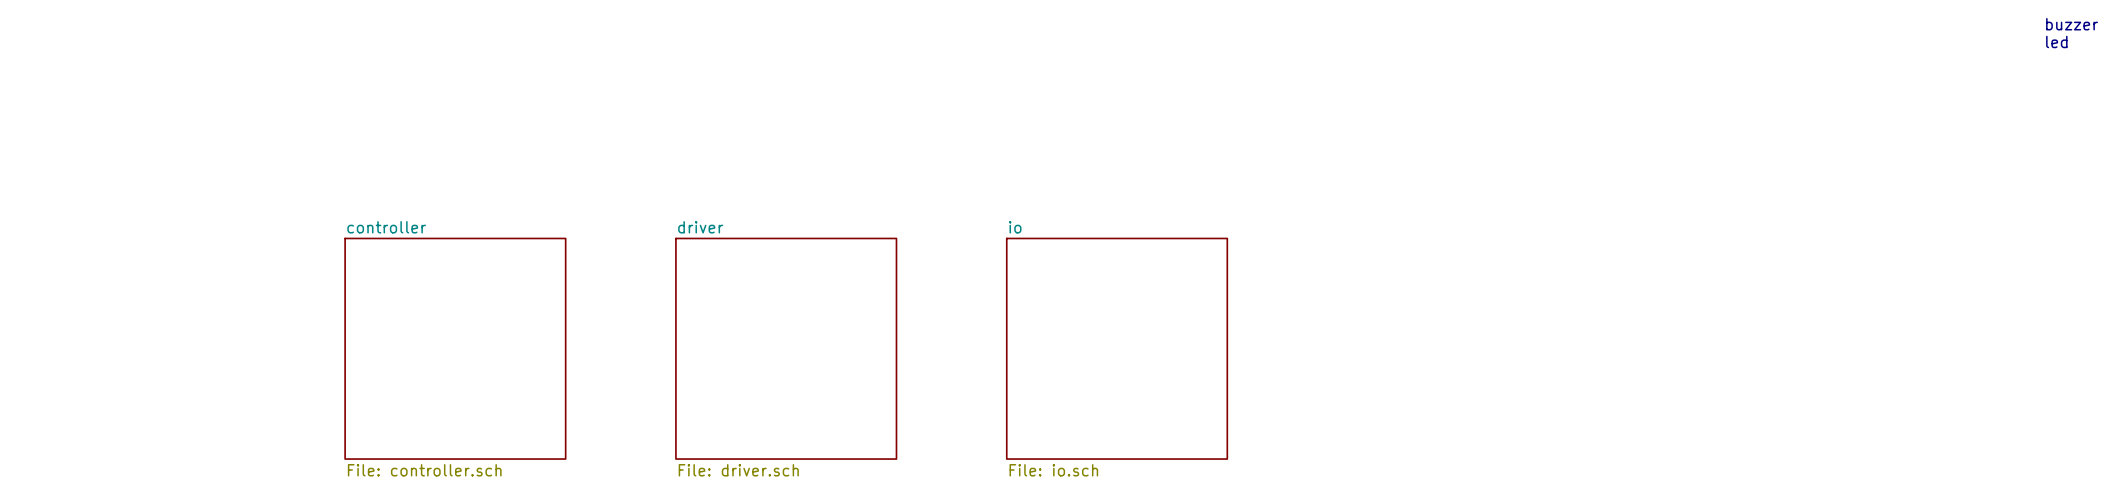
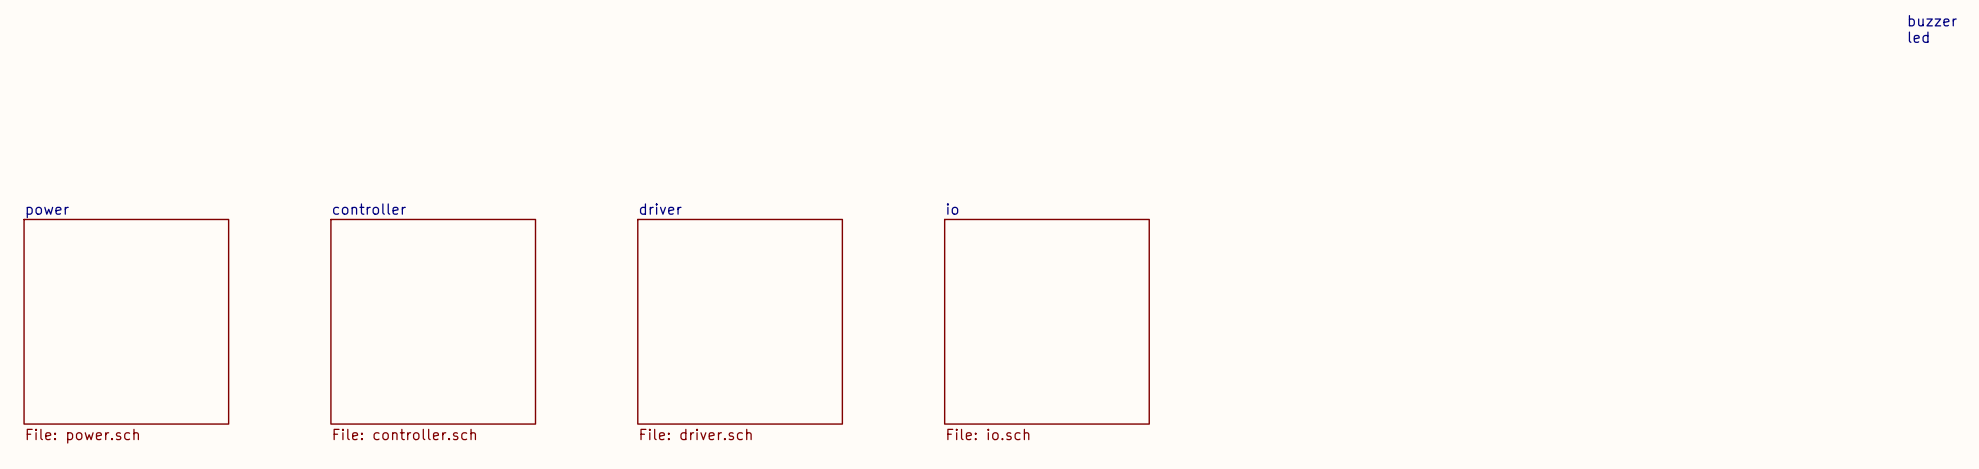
sheet power: none -> File: power.sch (126, 321)

